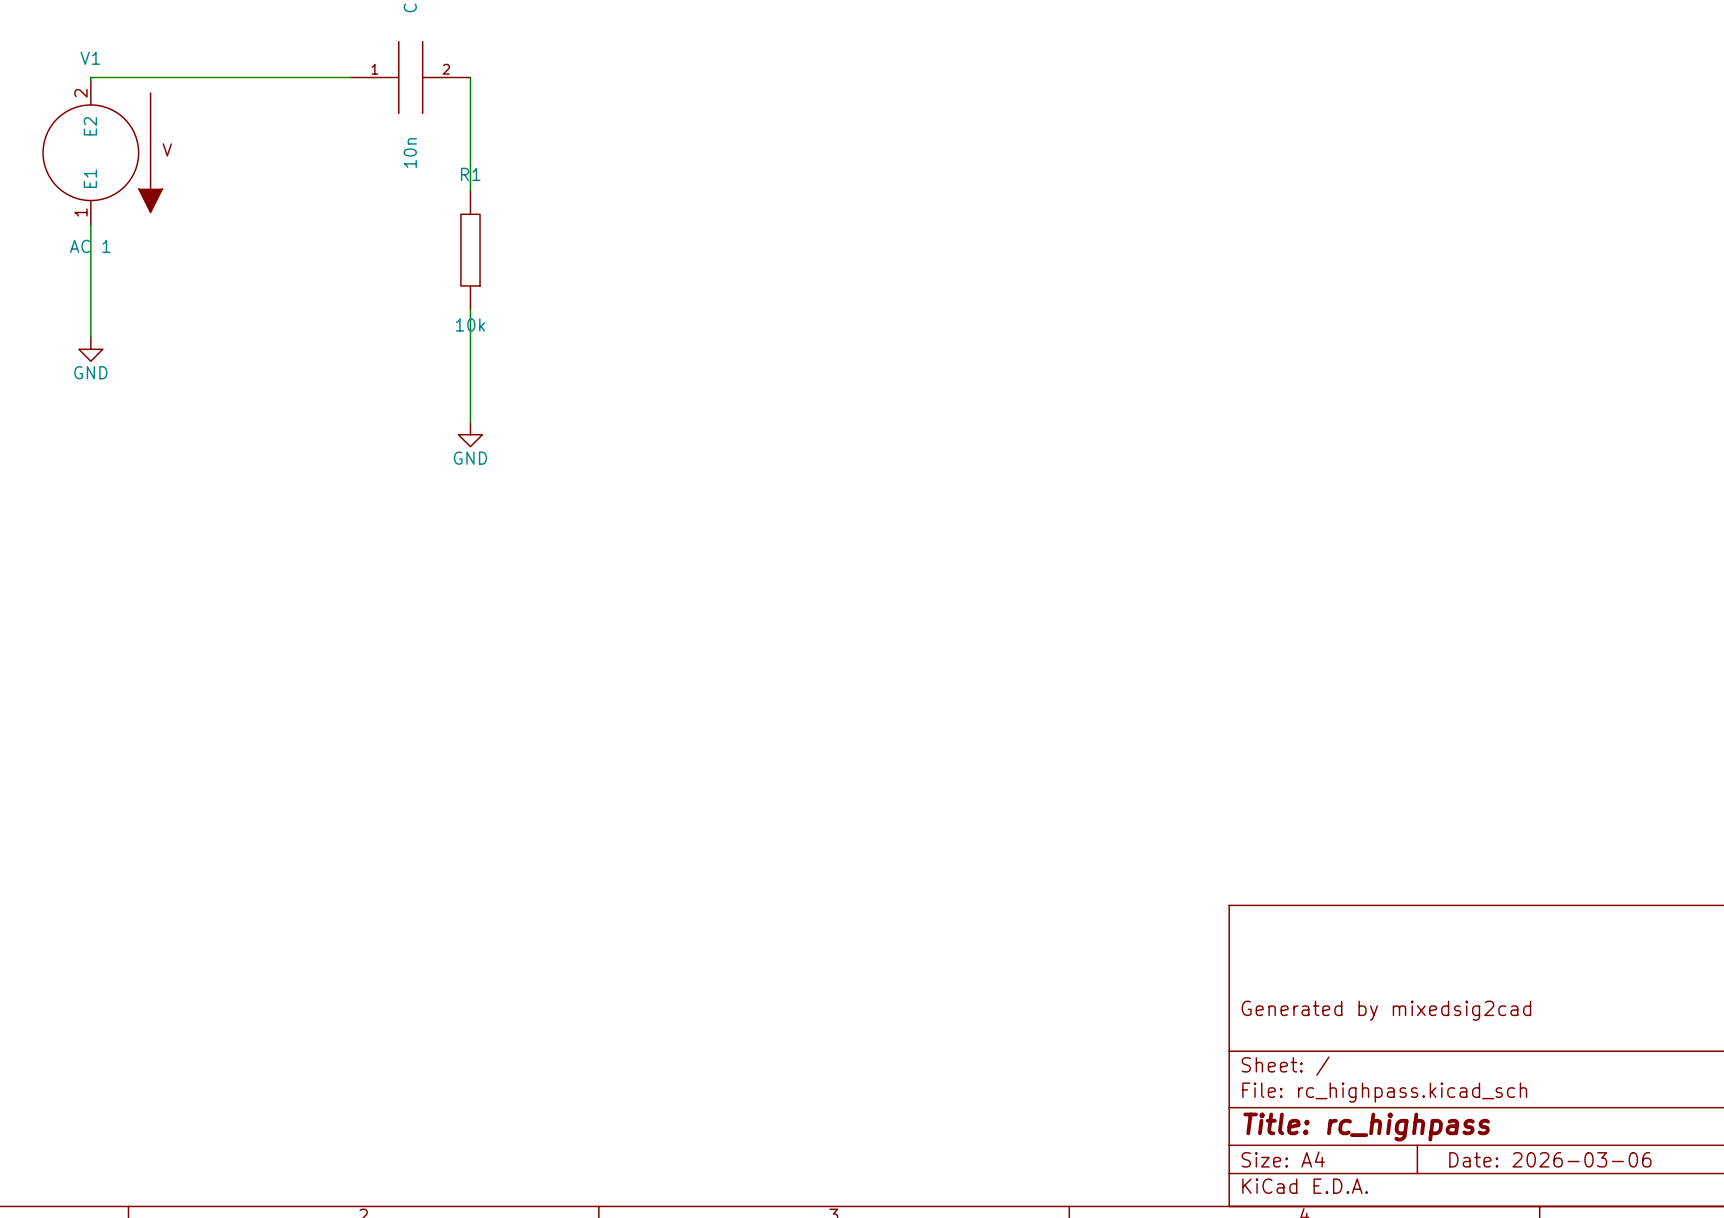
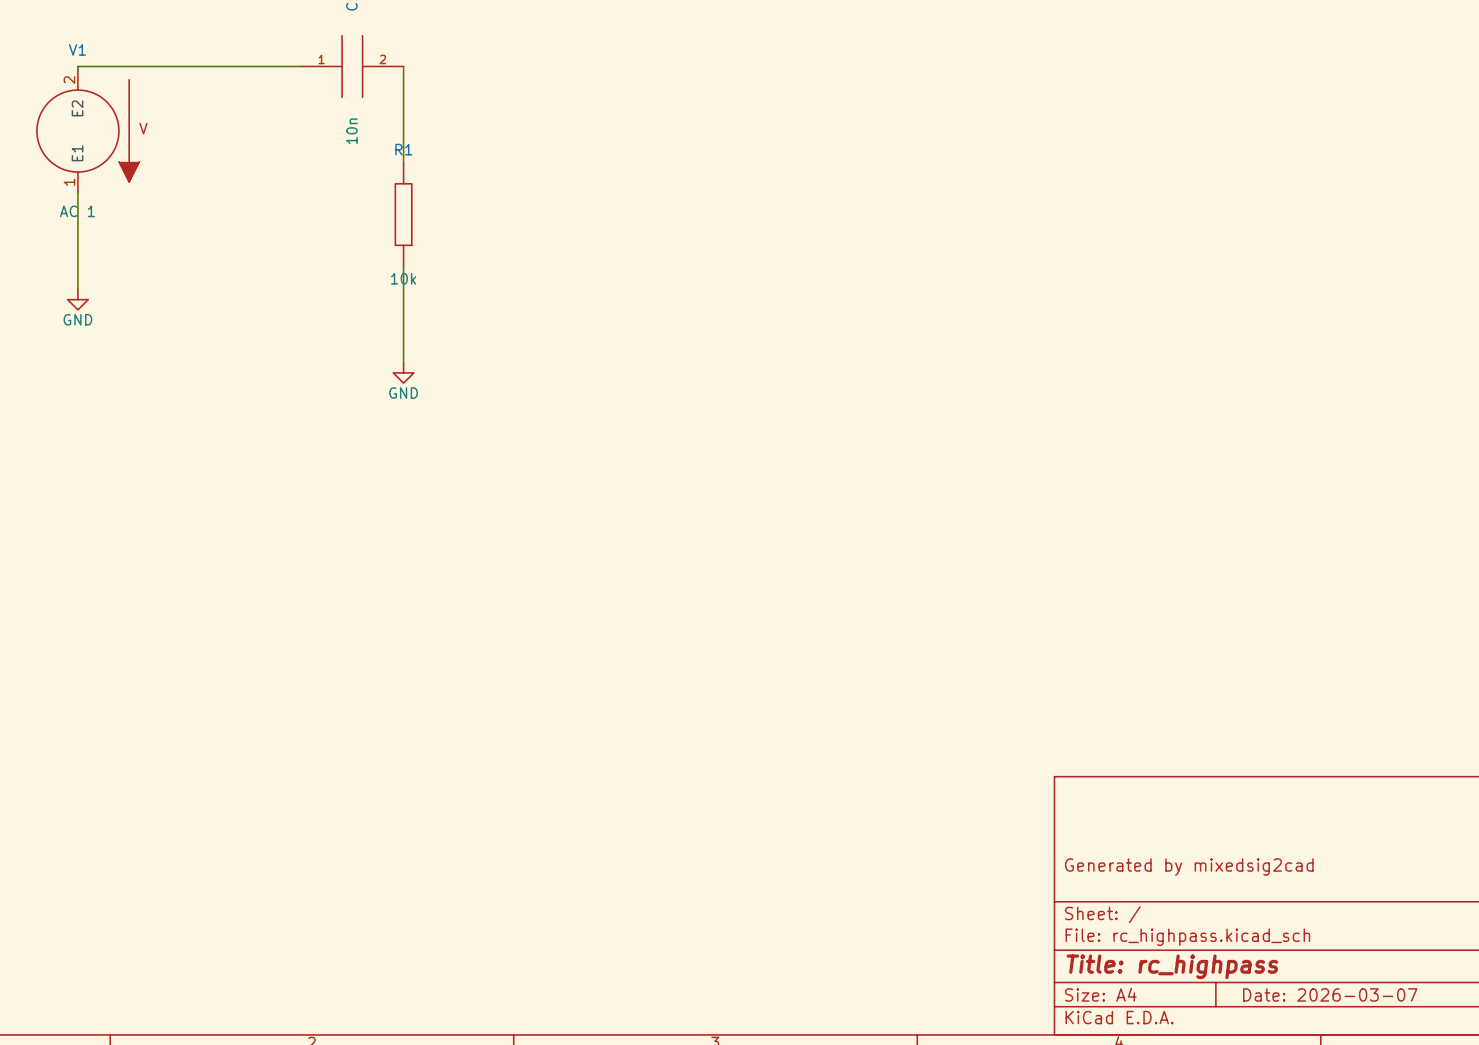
title block: Date: 2026-03-06 (1550, 1159) -> Date: 2026-03-07 (1330, 994)

